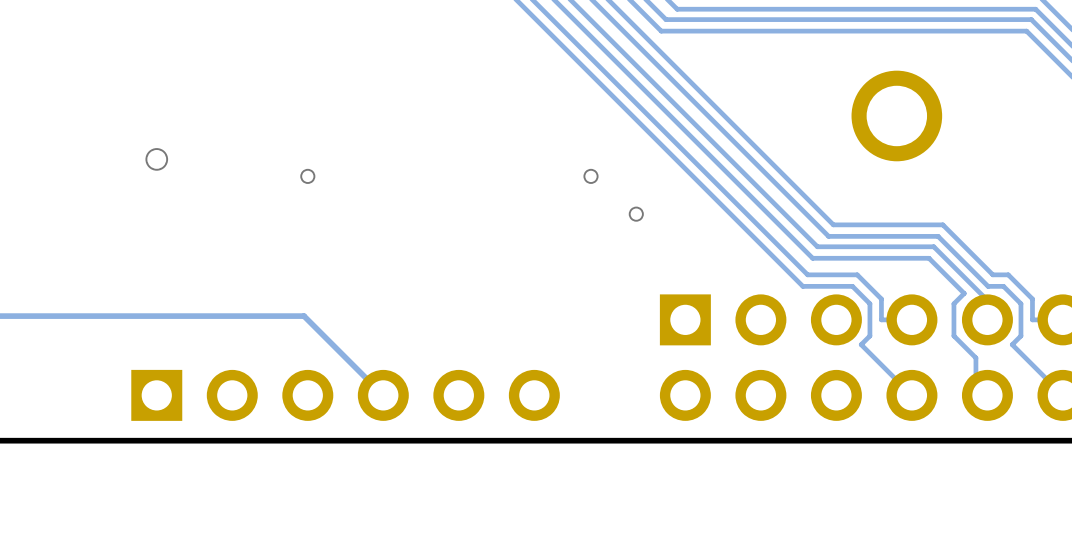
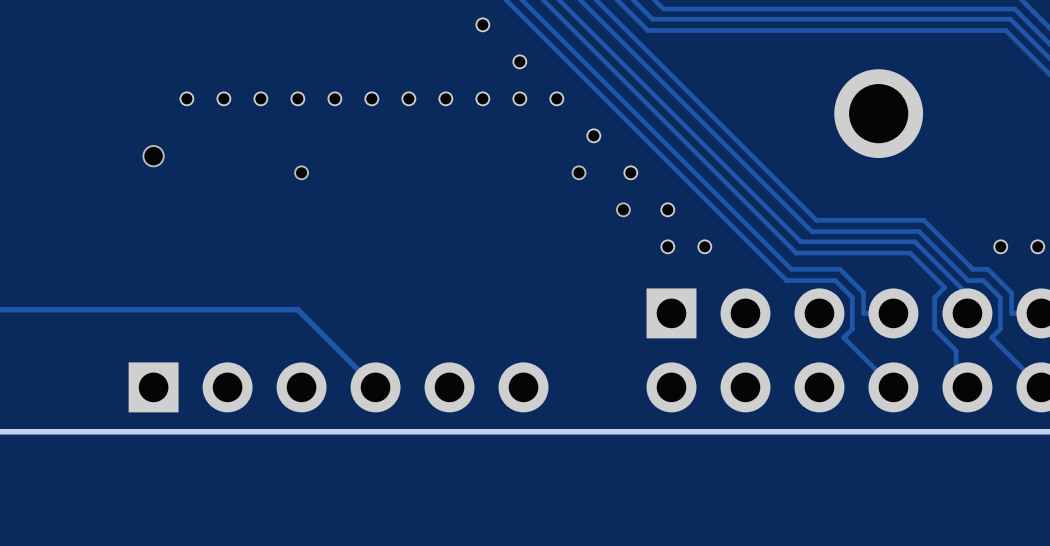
part: none -> (482, 24)
part: none -> (519, 61)
part: none -> (186, 98)
part: none -> (223, 98)
part: none -> (260, 98)
part: none -> (297, 98)
part: none -> (334, 98)
part: none -> (371, 98)
part: none -> (408, 98)
part: none -> (445, 98)
part: none -> (482, 98)
part: none -> (519, 98)
part: none -> (556, 98)
part: none -> (593, 135)
part: none -> (630, 172)
part: none -> (667, 209)
part: none -> (667, 246)
part: none -> (704, 246)
part: none -> (1000, 246)
part: none -> (1037, 246)

